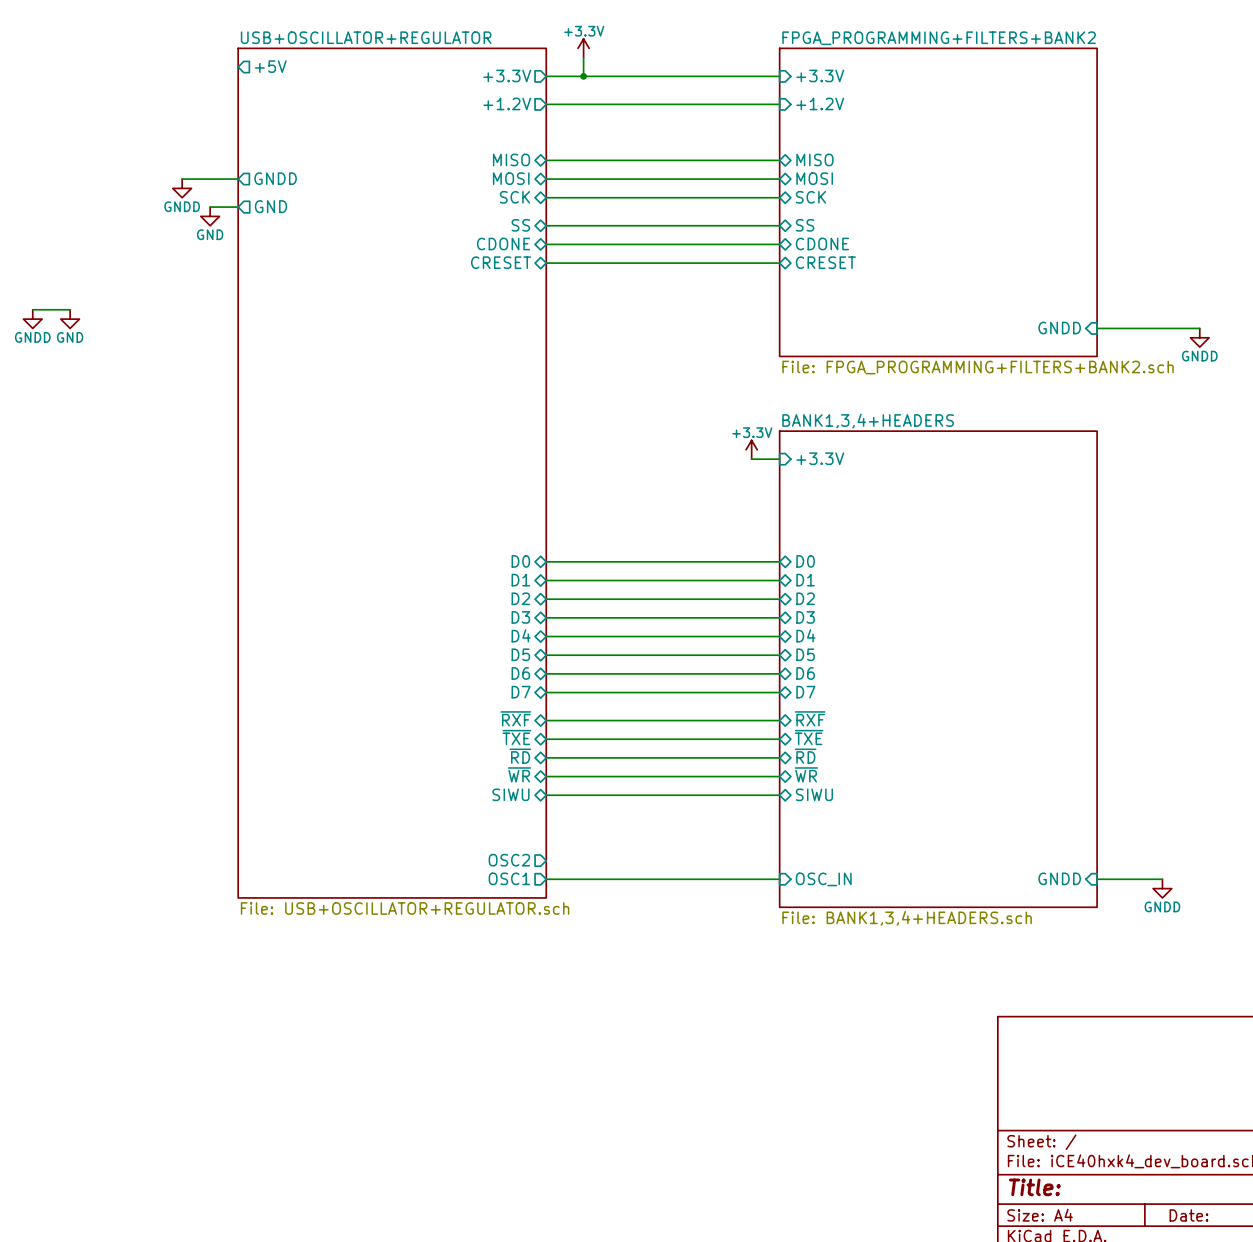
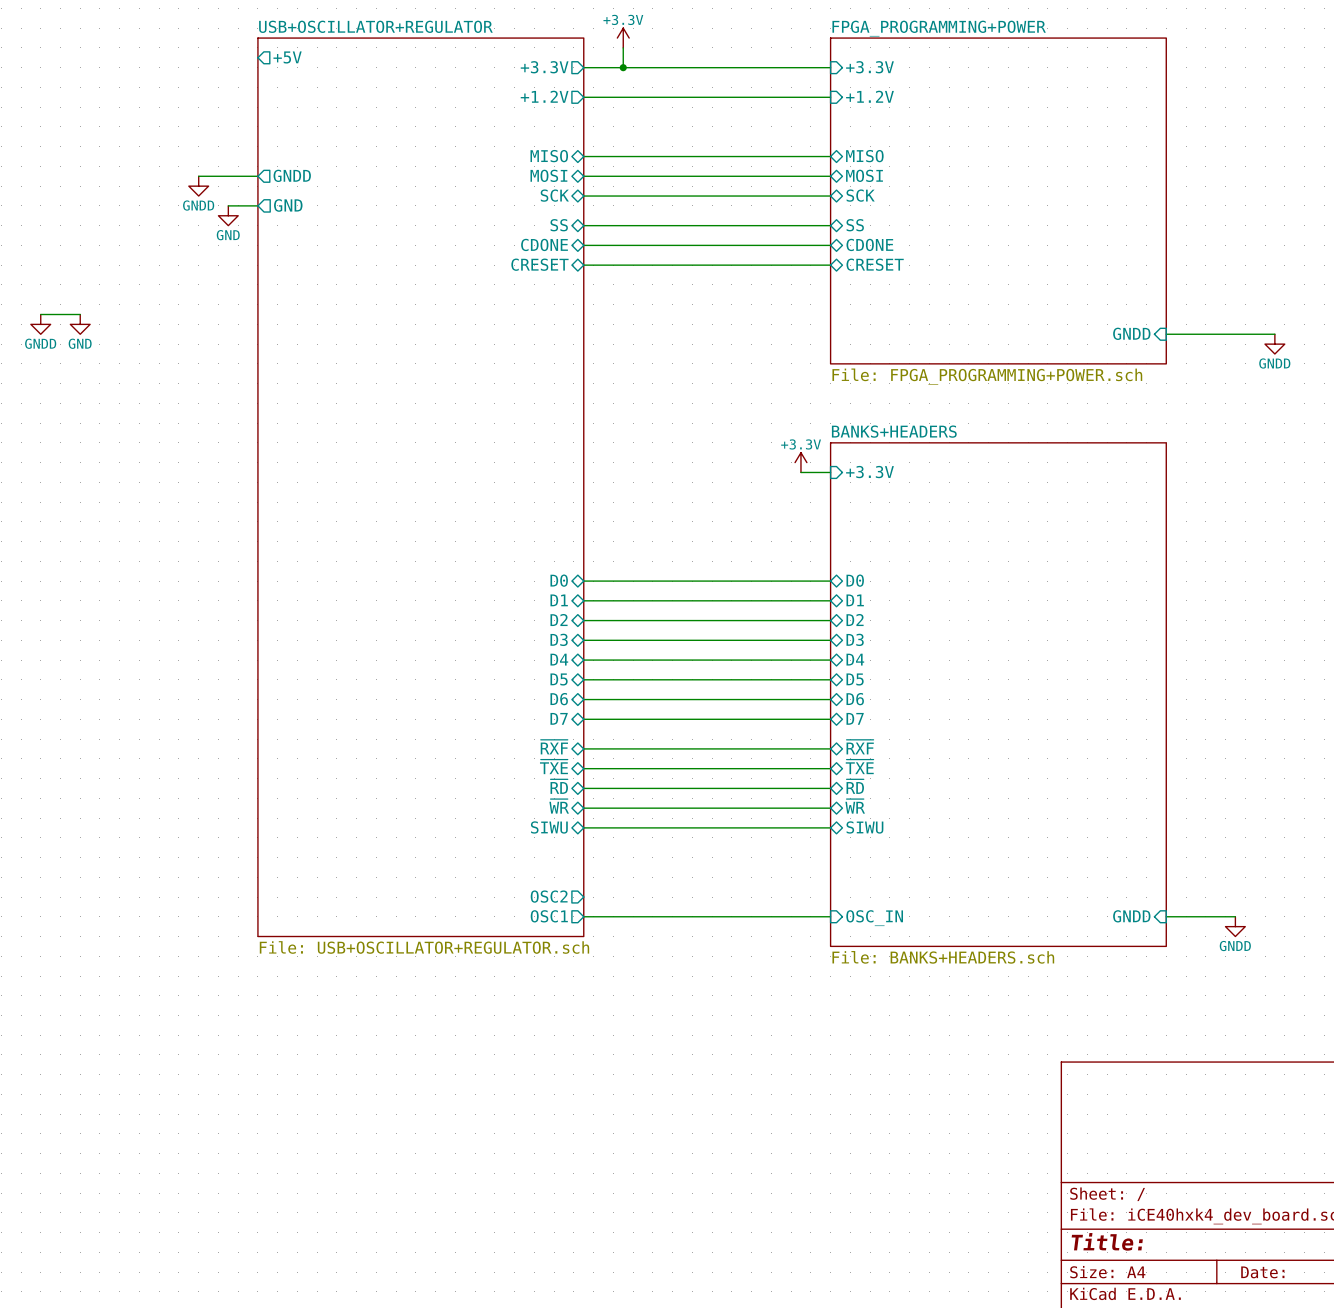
sheet FPGA_PROGRAMMING+FILTERS+BANK2 name: FPGA_PROGRAMMING+FILTERS+BANK2 (939, 38) -> FPGA_PROGRAMMING+POWER (939, 28)
sheet FPGA_PROGRAMMING+FILTERS+BANK2 value: File: FPGA_PROGRAMMING+FILTERS+BANK2.sch (978, 367) -> File: FPGA_PROGRAMMING+POWER.sch (987, 376)
sheet BANK1,3,4+HEADERS name: BANK1,3,4+HEADERS (868, 421) -> BANKS+HEADERS (894, 431)
sheet BANK1,3,4+HEADERS value: File: BANK1,3,4+HEADERS.sch (907, 918) -> File: BANKS+HEADERS.sch (943, 957)

